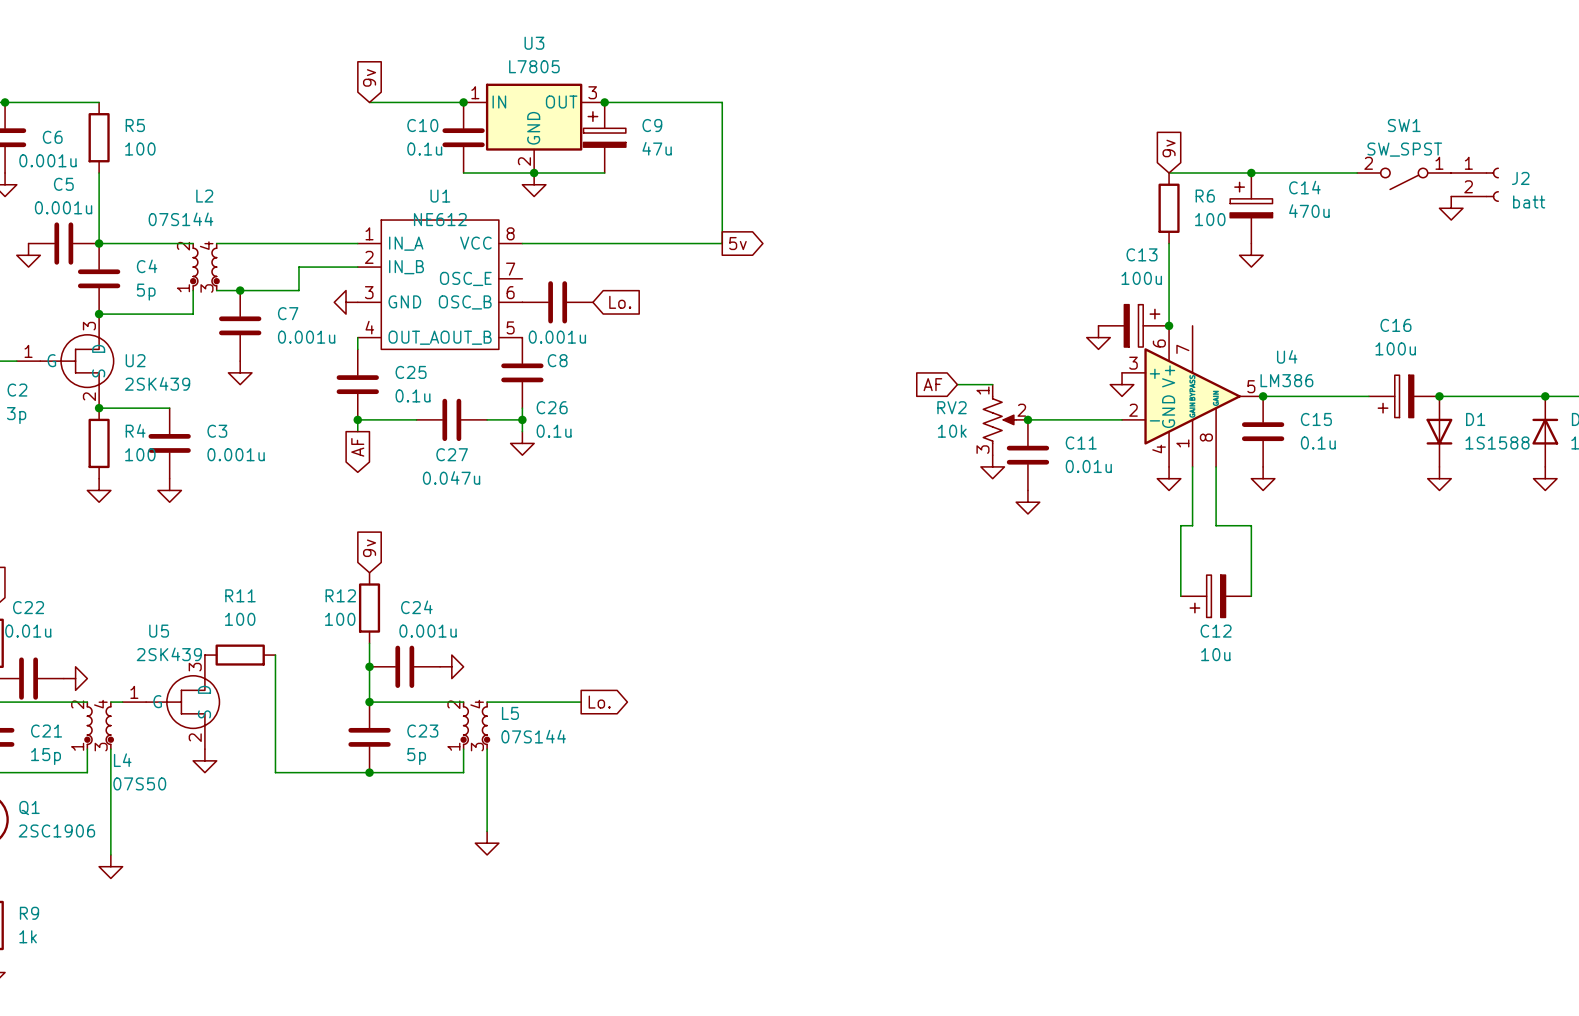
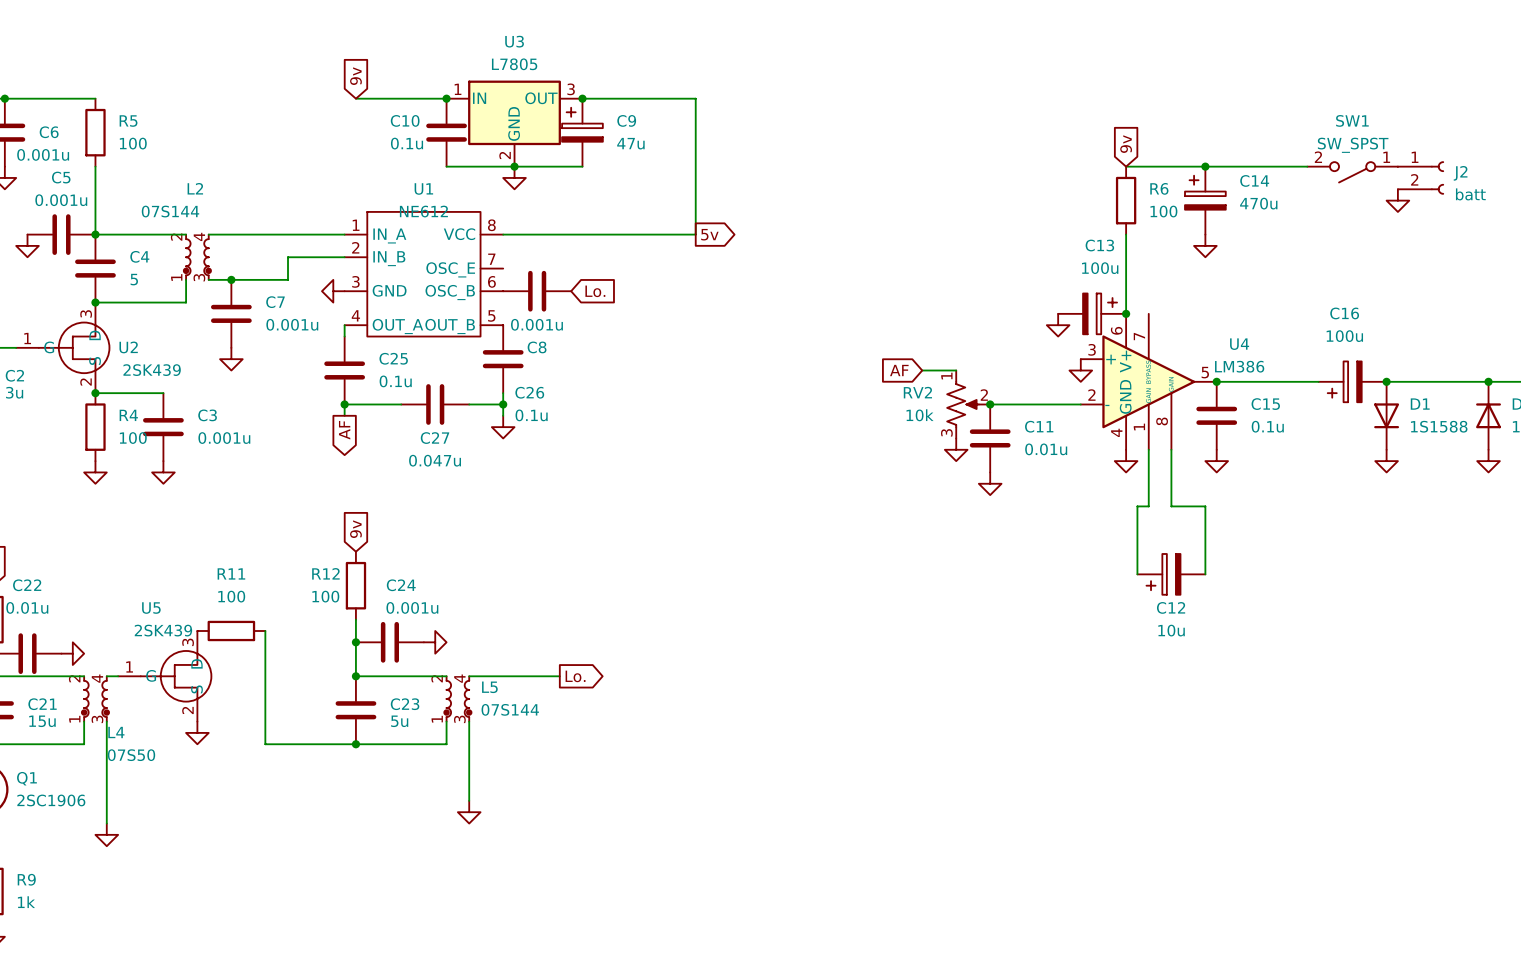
C4 value: 5p (146, 292) -> 5 (134, 279)
C2 value: 3p (16, 415) -> 3u (14, 392)
C21 value: 15p (46, 756) -> 15u (42, 721)
C23 value: 5p (416, 756) -> 5u (399, 721)

